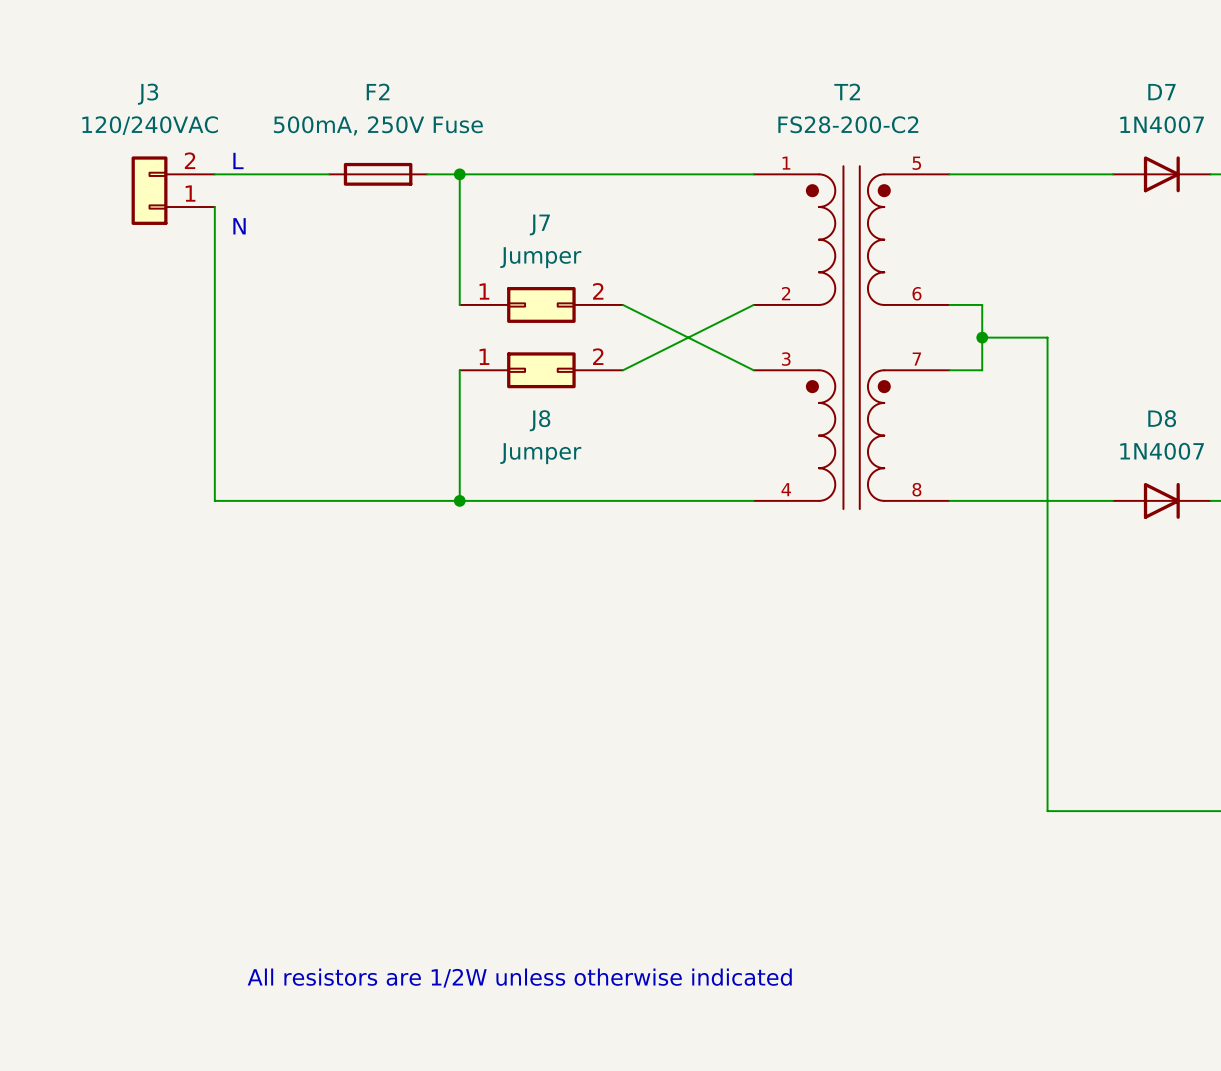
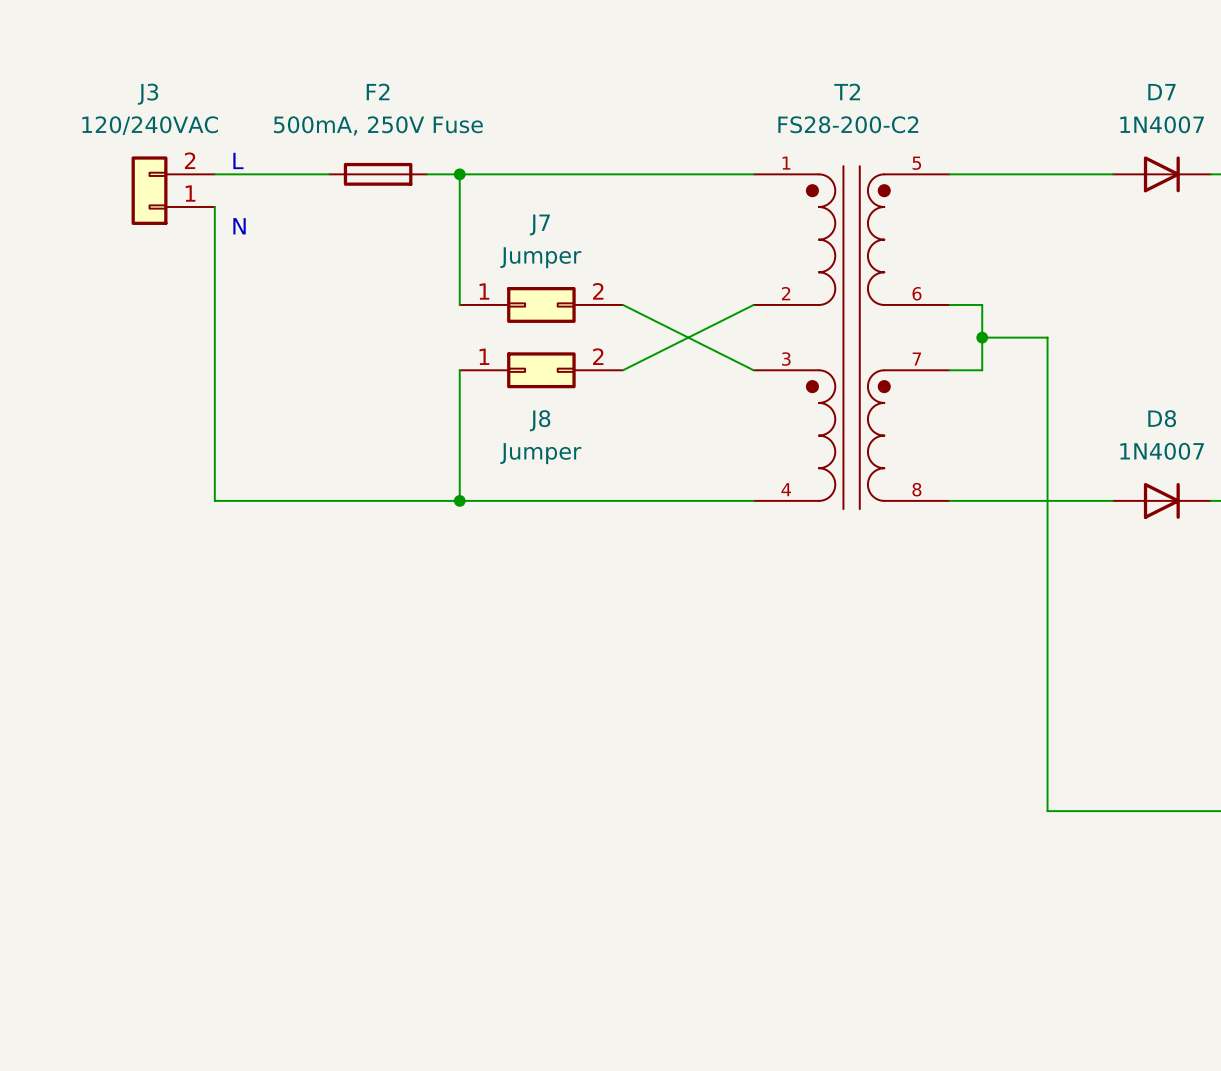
text: All resistors are 1/2W unless otherwise indicated (519, 978) -> none

